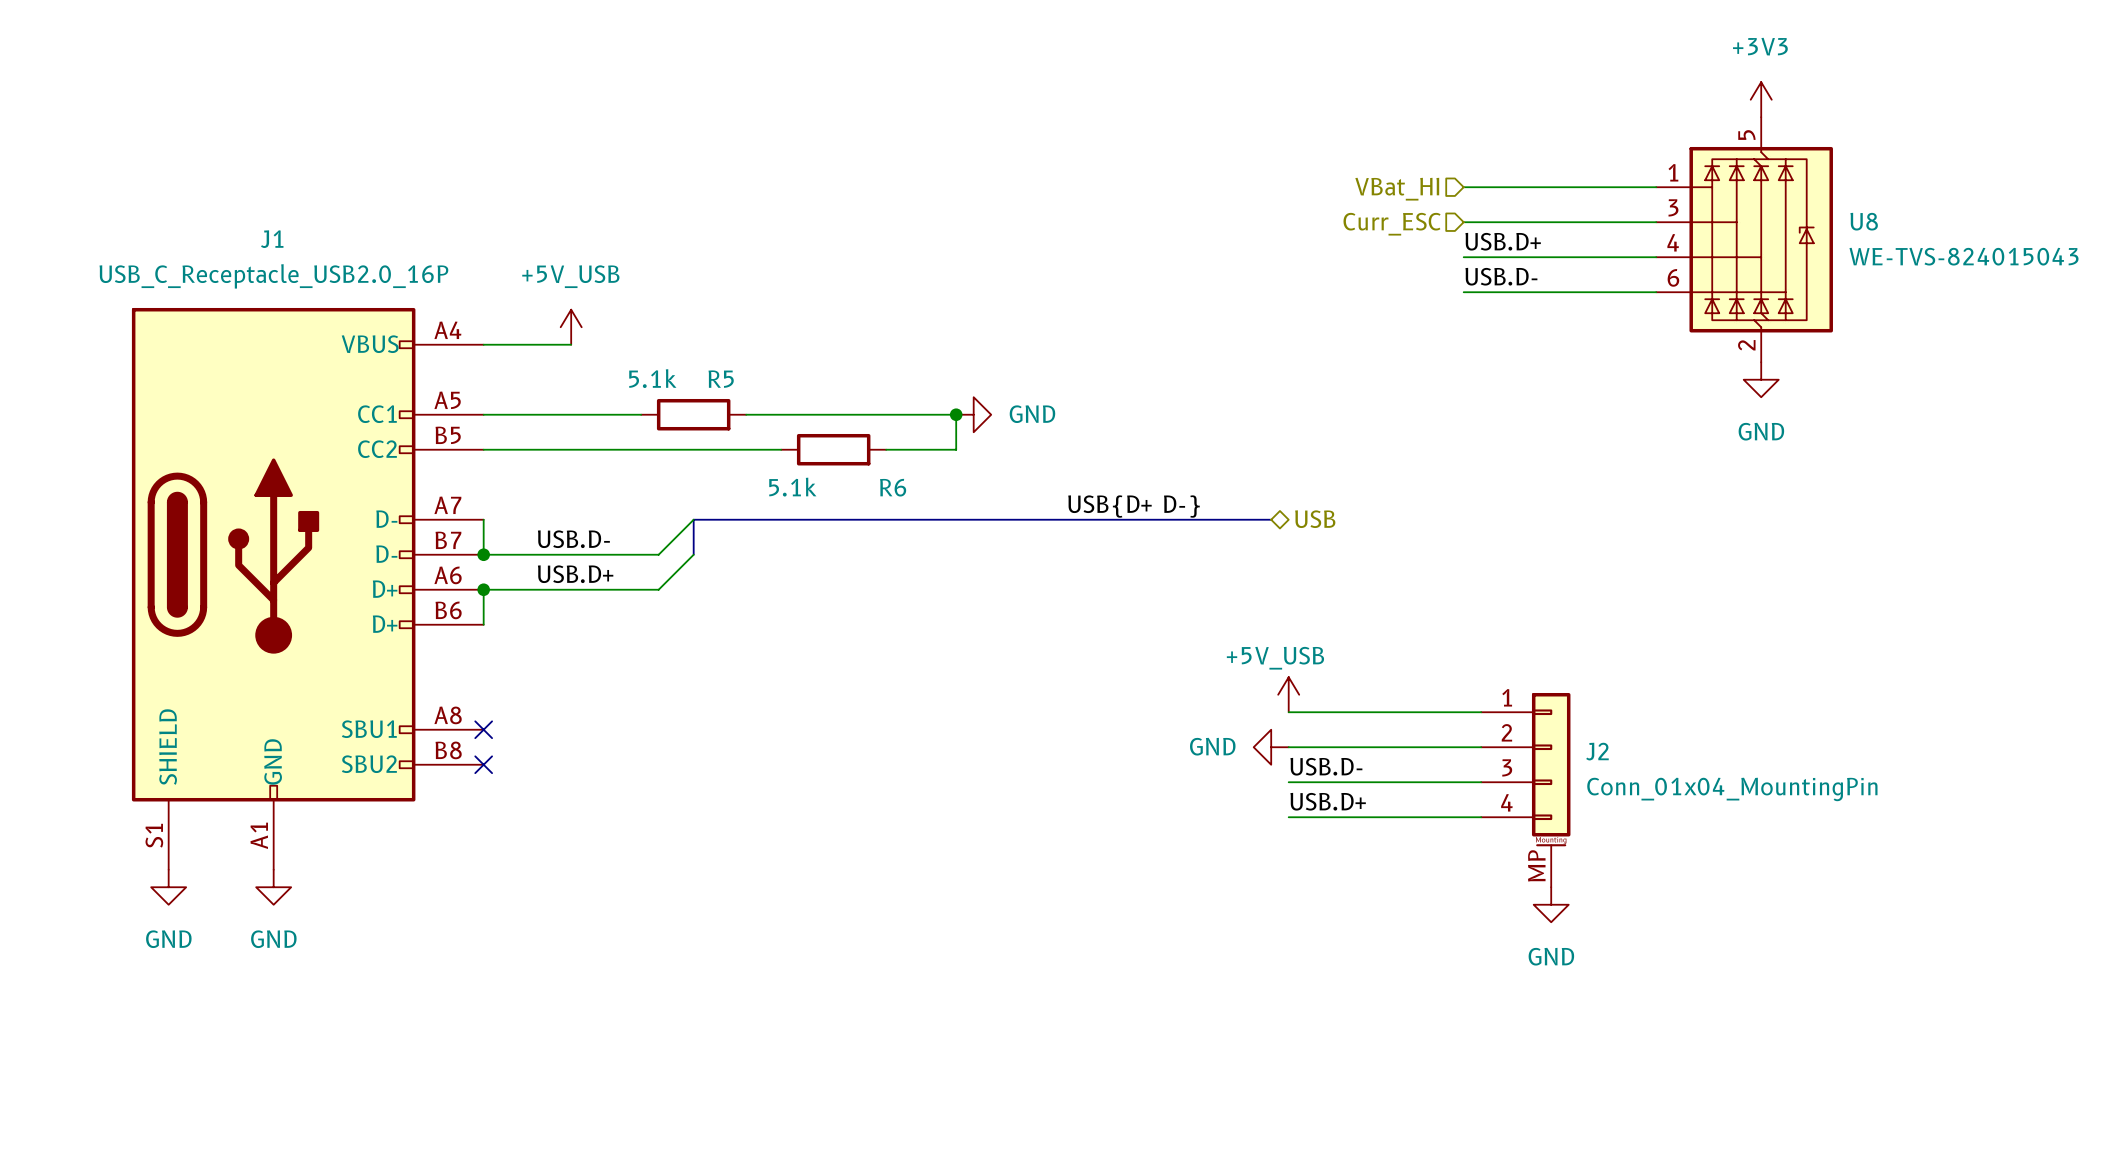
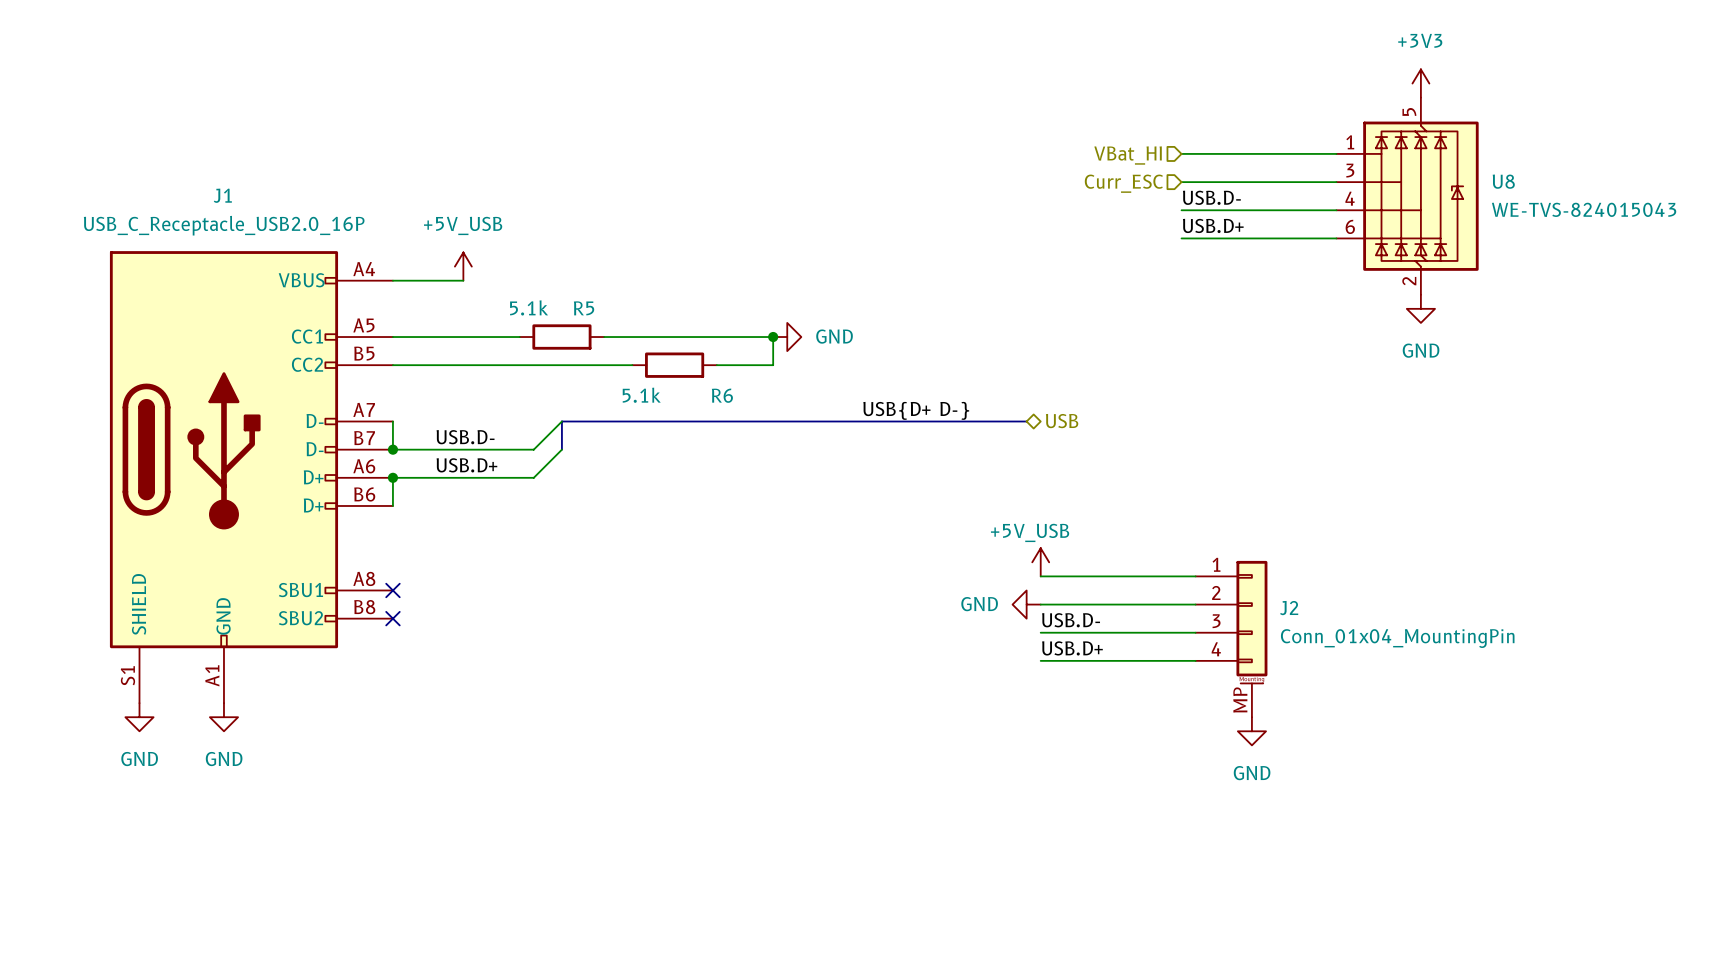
label: USB.D+ (1503, 241) -> USB.D- (1211, 197)
label: USB.D- (1501, 276) -> USB.D+ (1213, 225)

